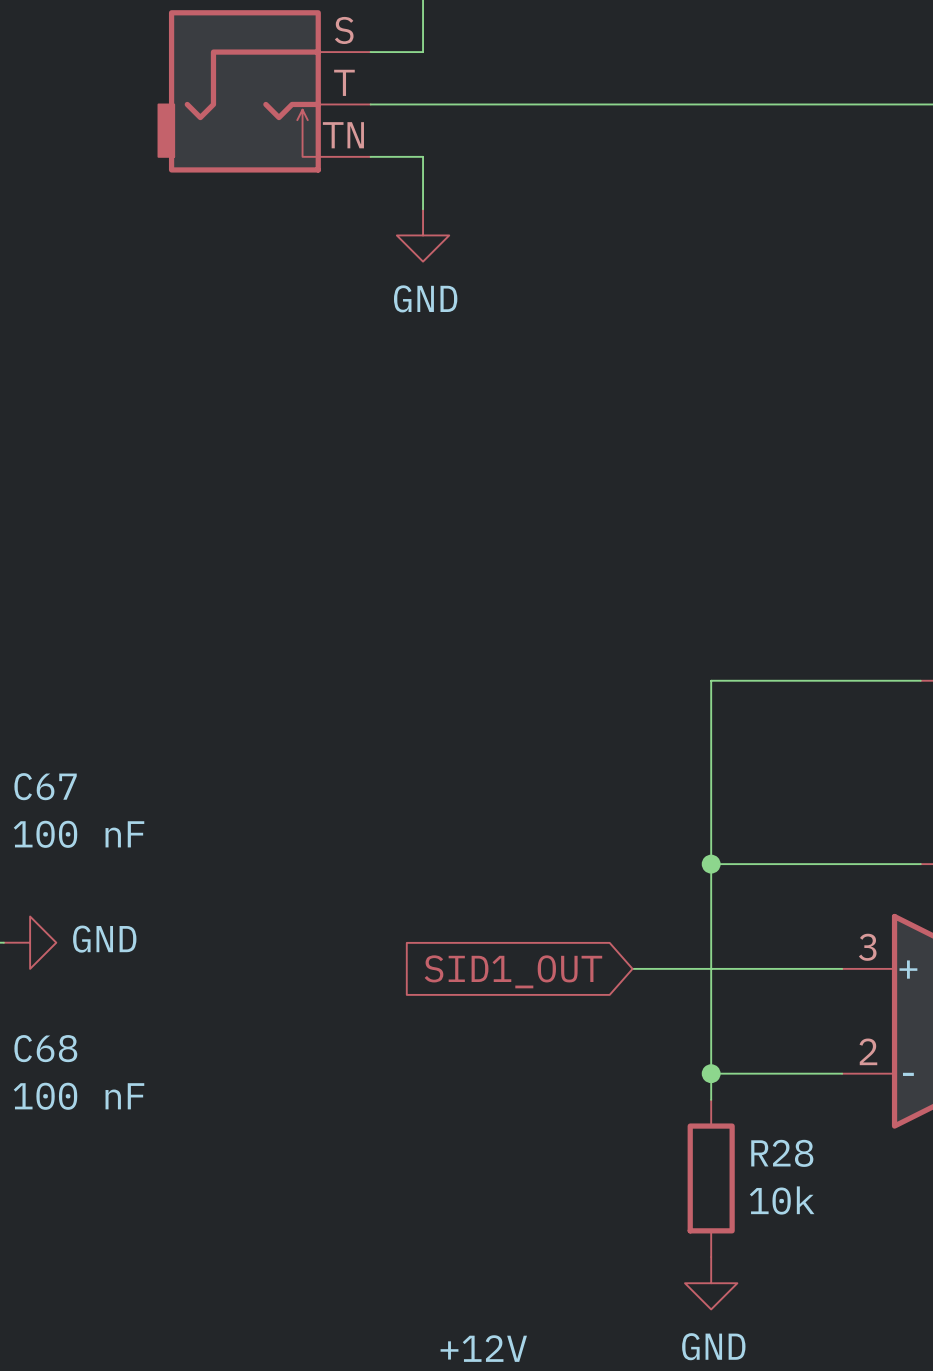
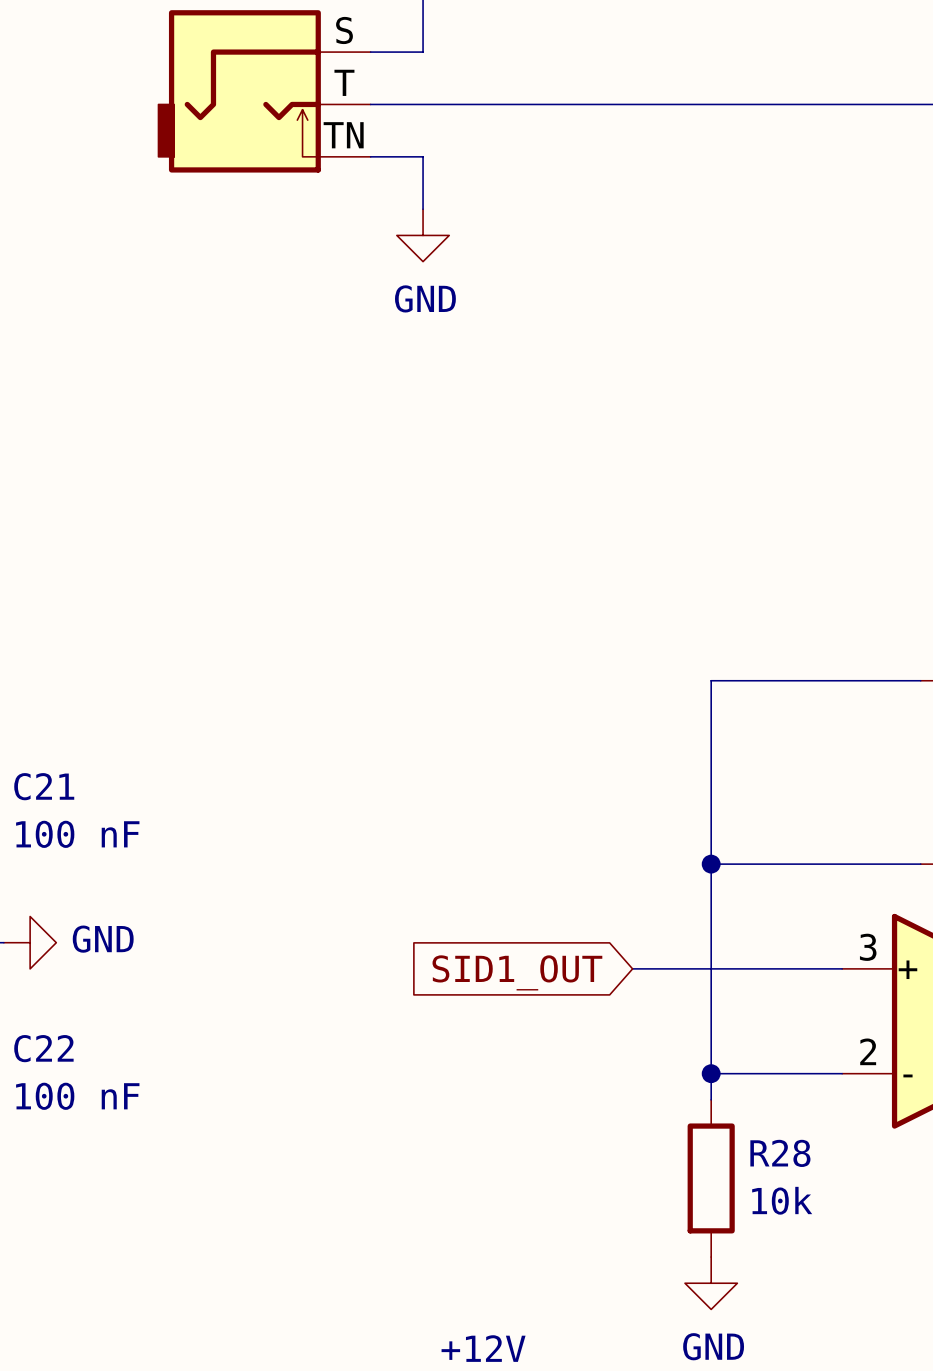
C67 name: C67 (45, 786) -> C21 (44, 786)
C68 name: C68 (45, 1048) -> C22 (43, 1048)

